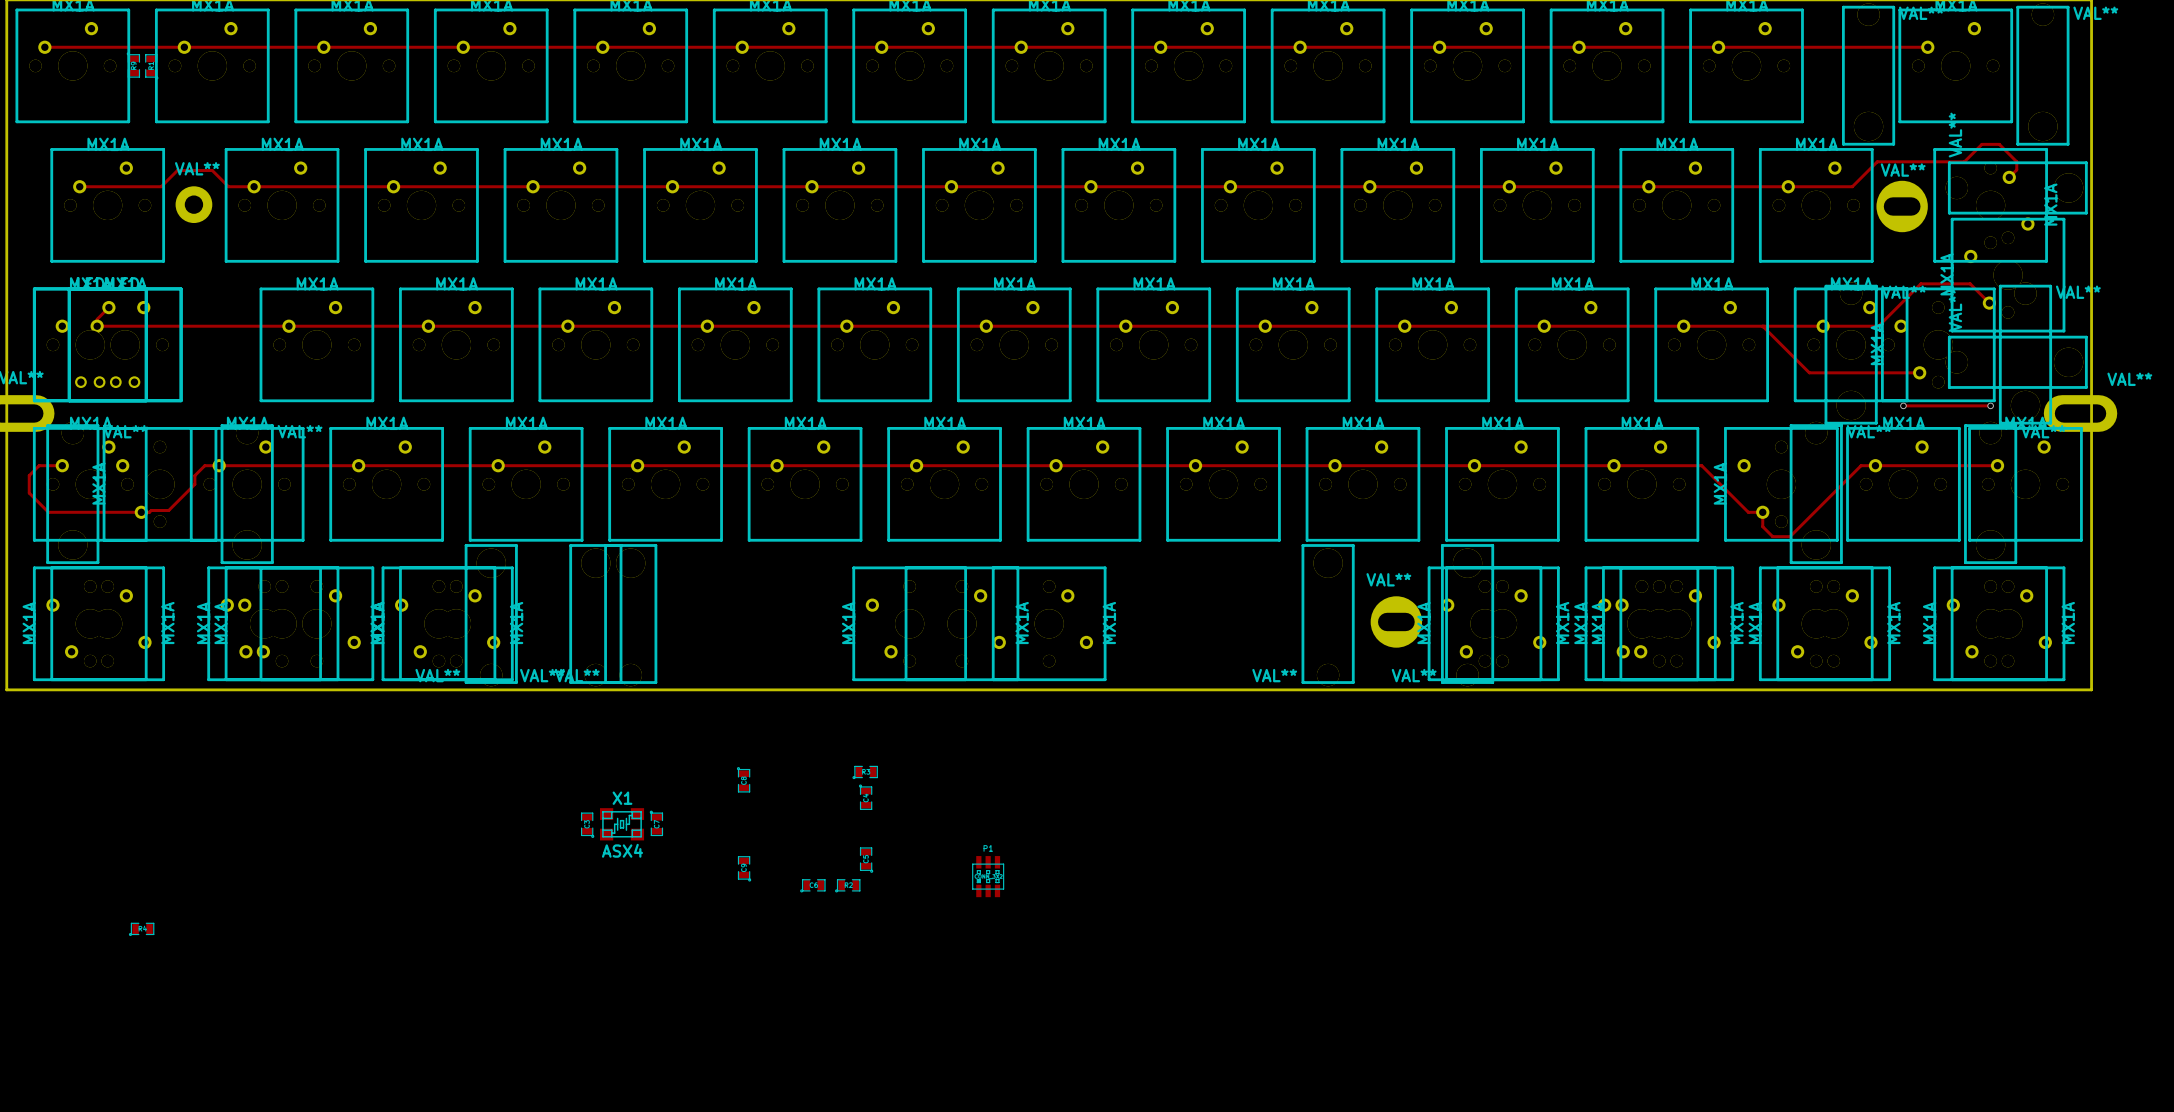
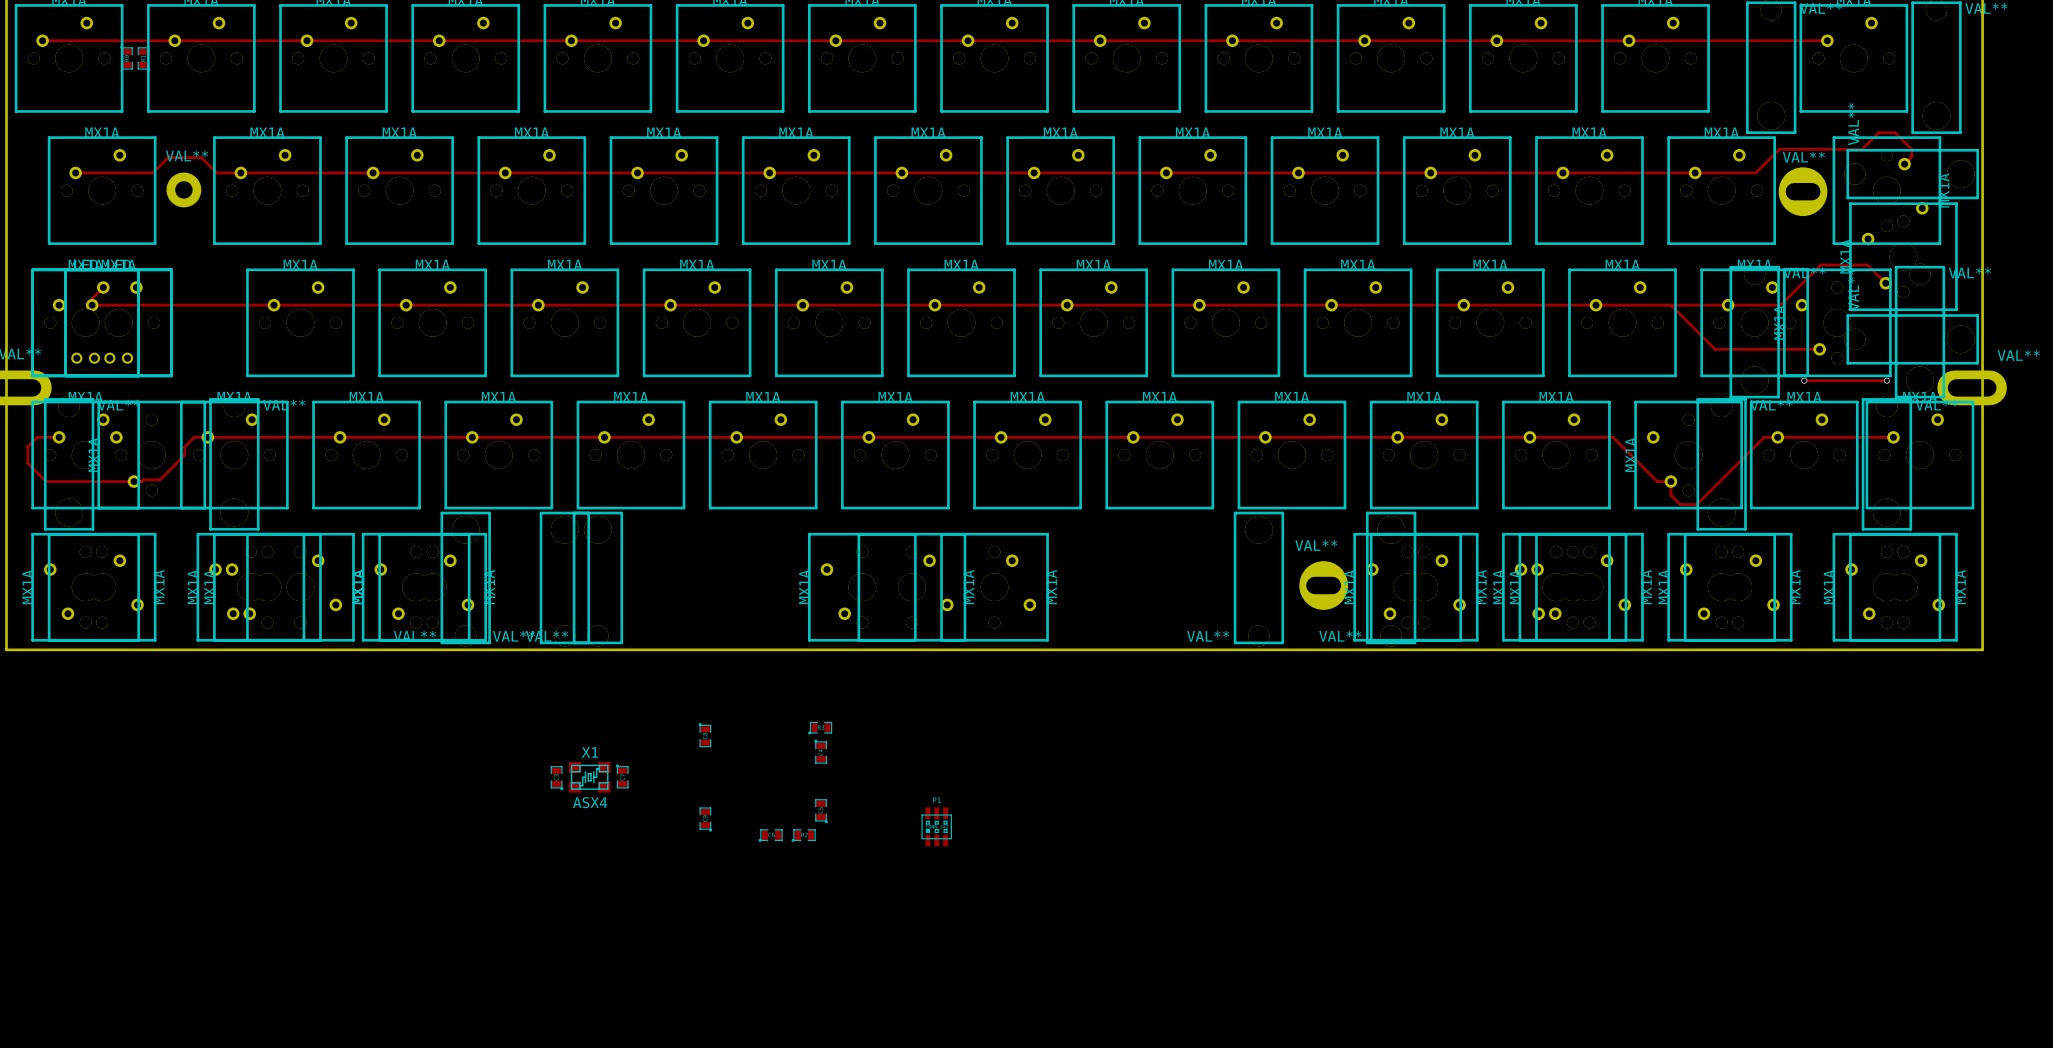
part: (141, 929) -> none

